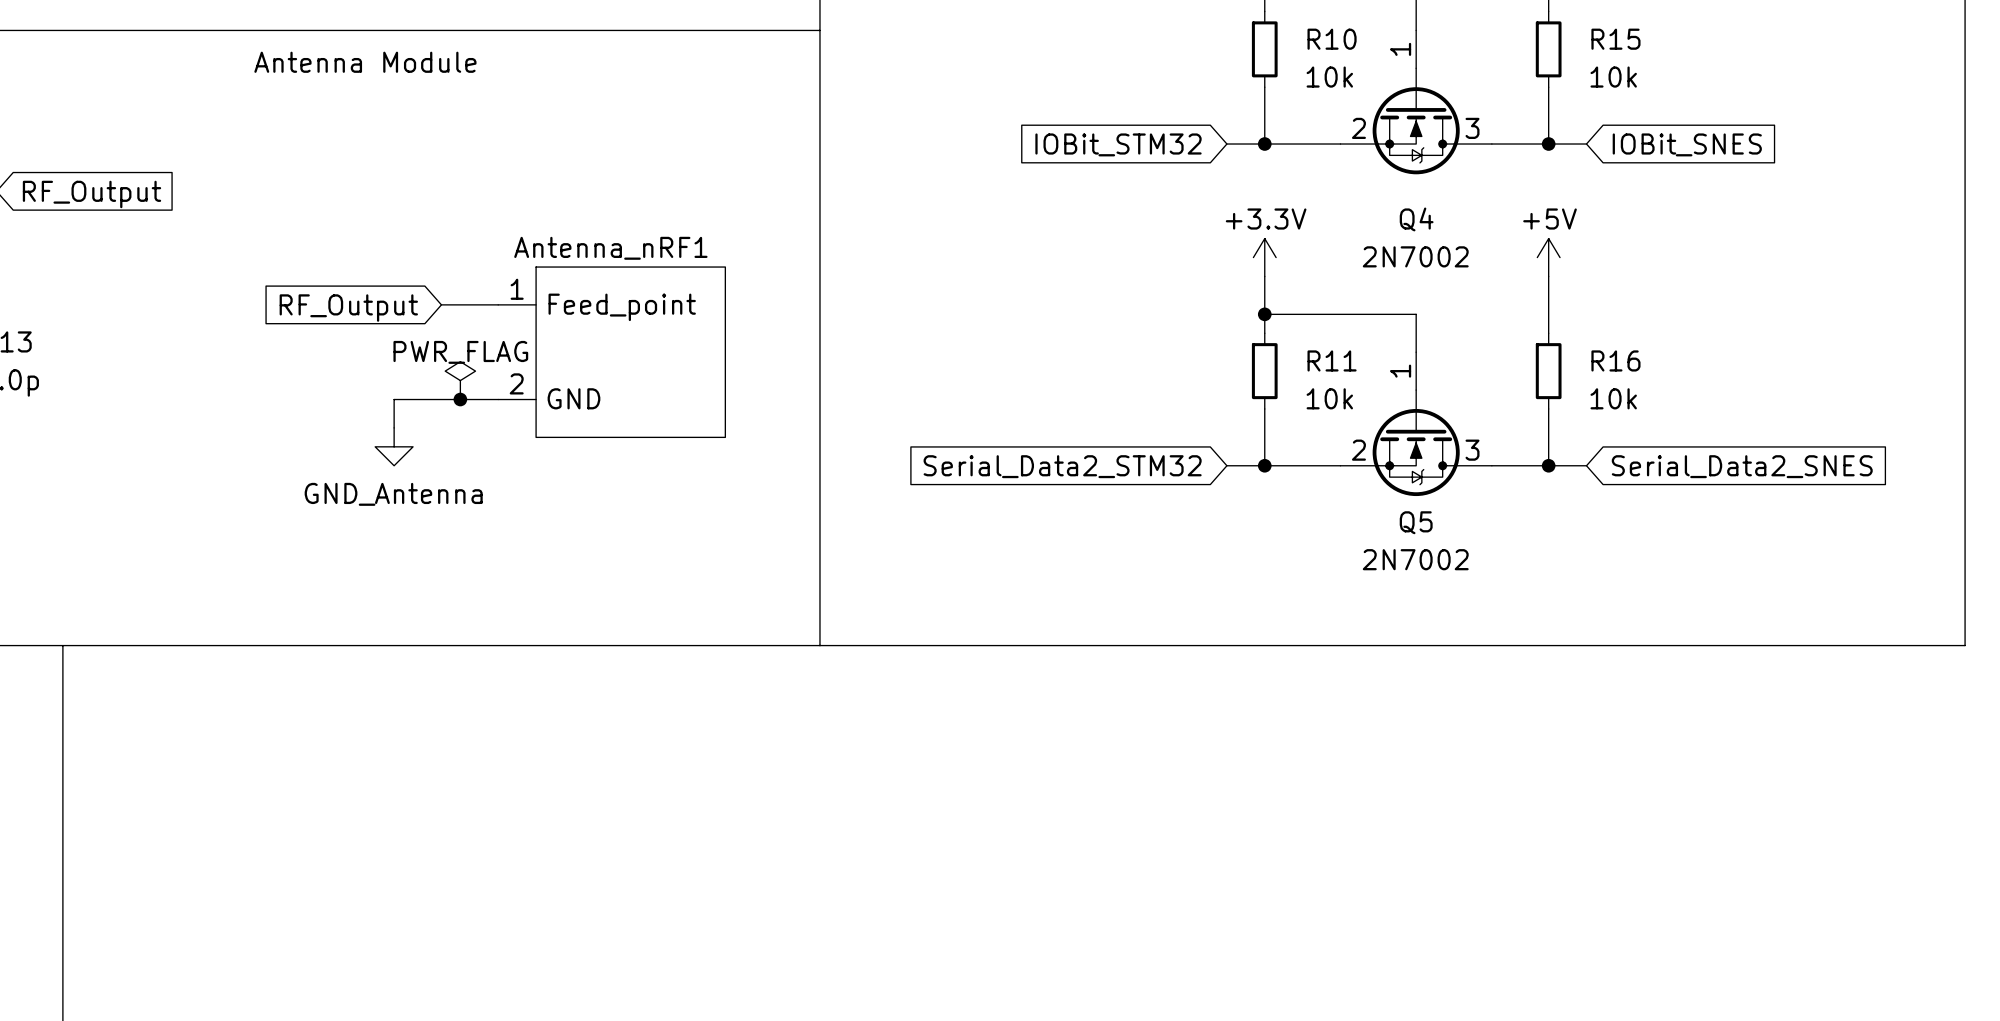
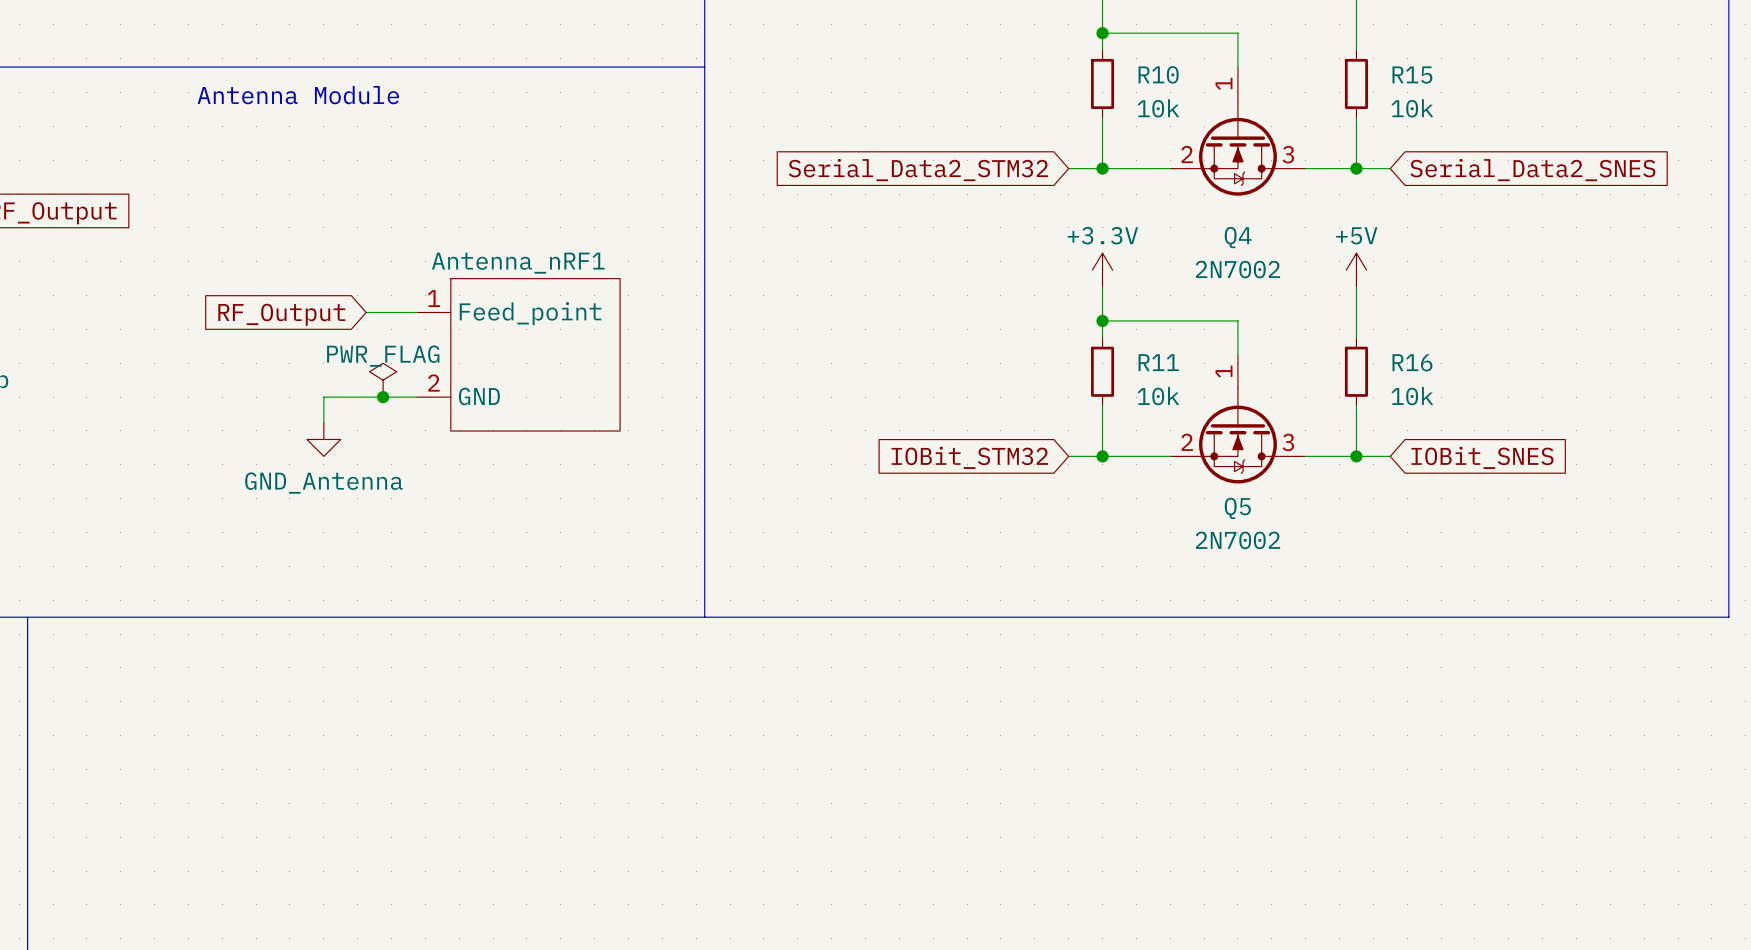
global label: IOBit_STM32 (1118, 144) -> Serial_Data2_STM32 (918, 170)
global label: IOBit_SNES (1687, 144) -> Serial_Data2_SNES (1532, 170)
global label: Serial_Data2_STM32 (1062, 466) -> IOBit_STM32 (969, 457)
global label: Serial_Data2_SNES (1742, 466) -> IOBit_SNES (1482, 457)

